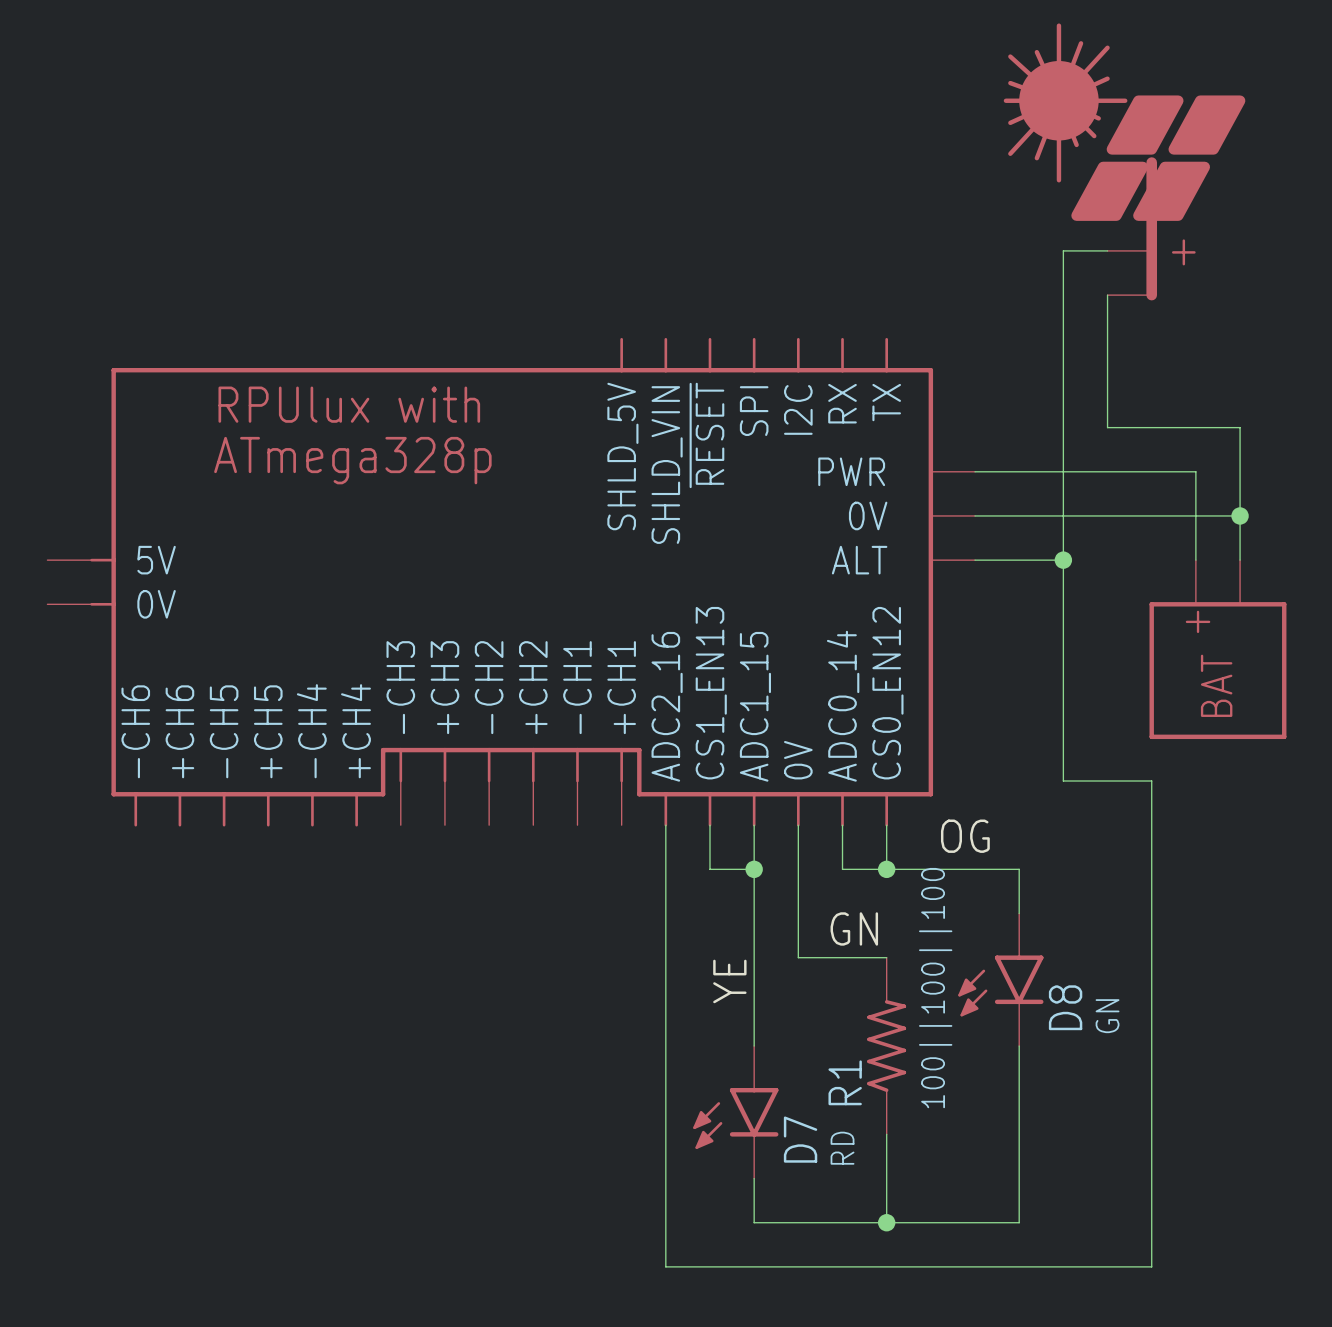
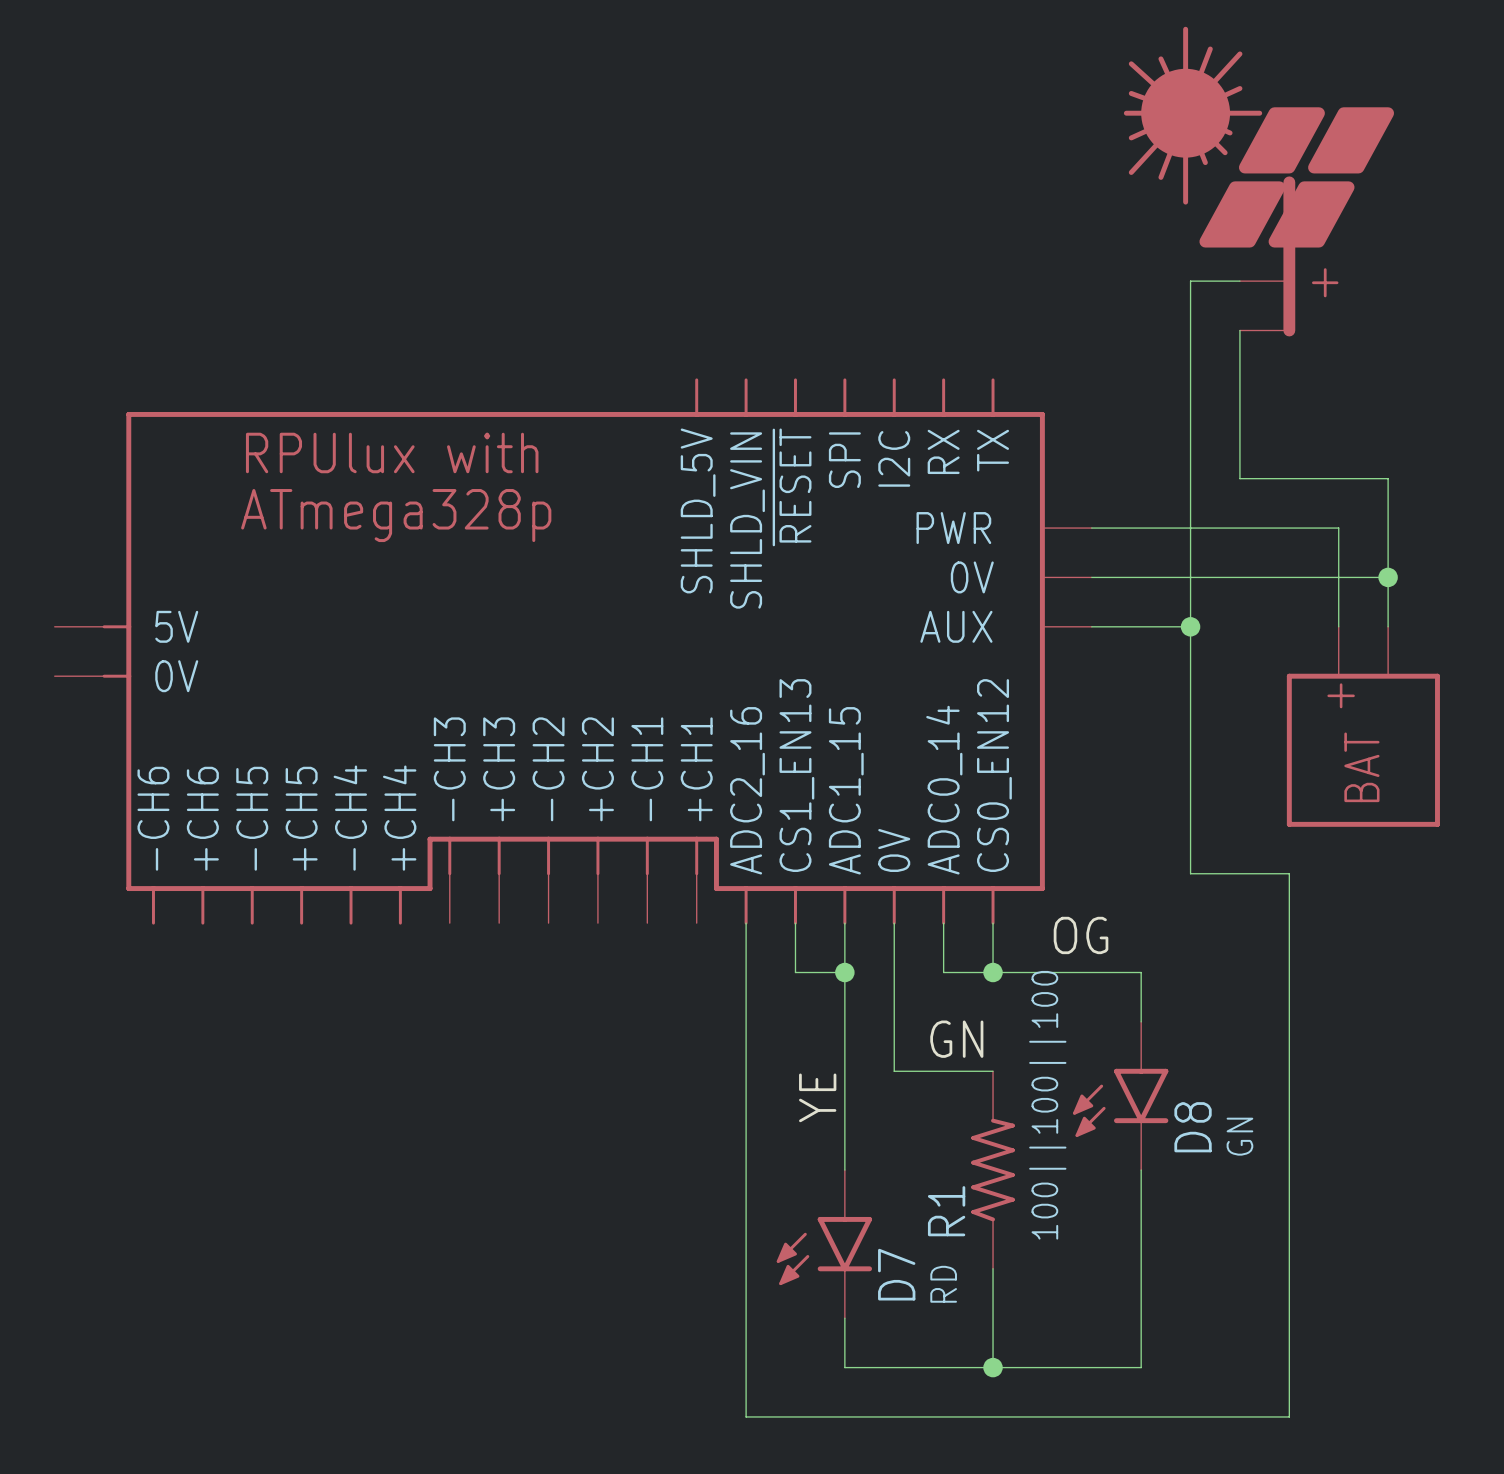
part pin name: ALT (859, 560) -> AUX (956, 626)

